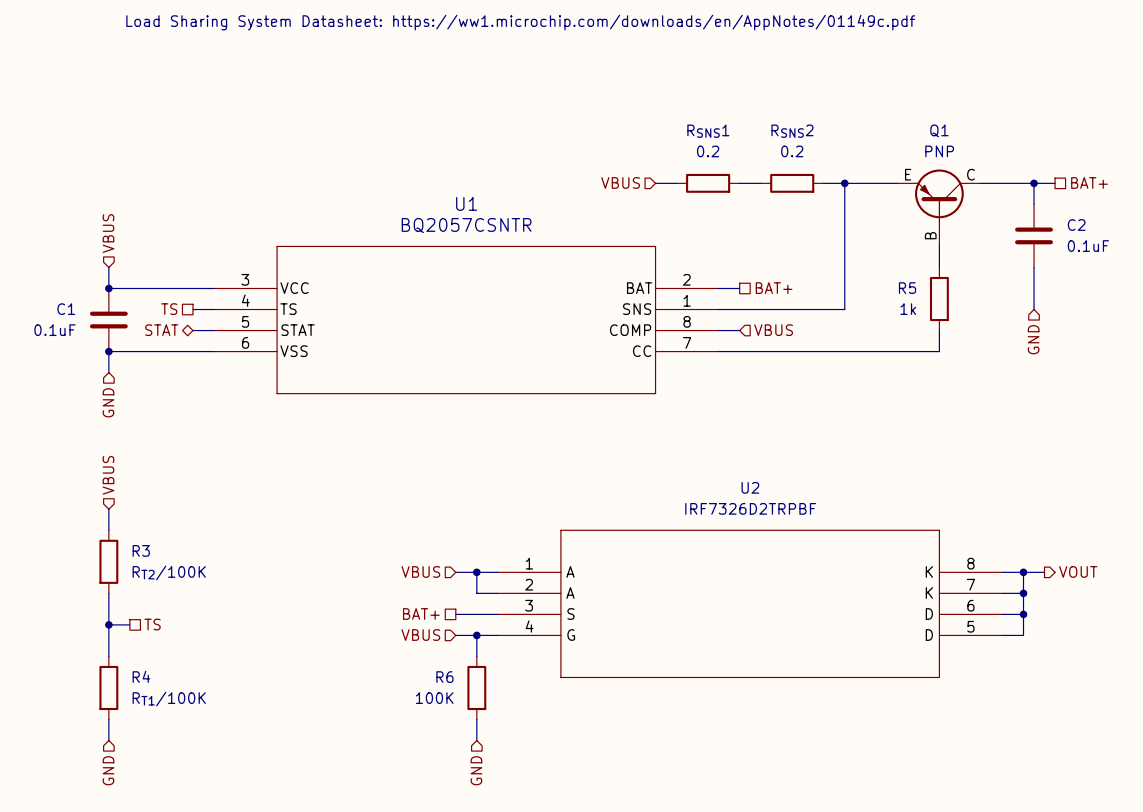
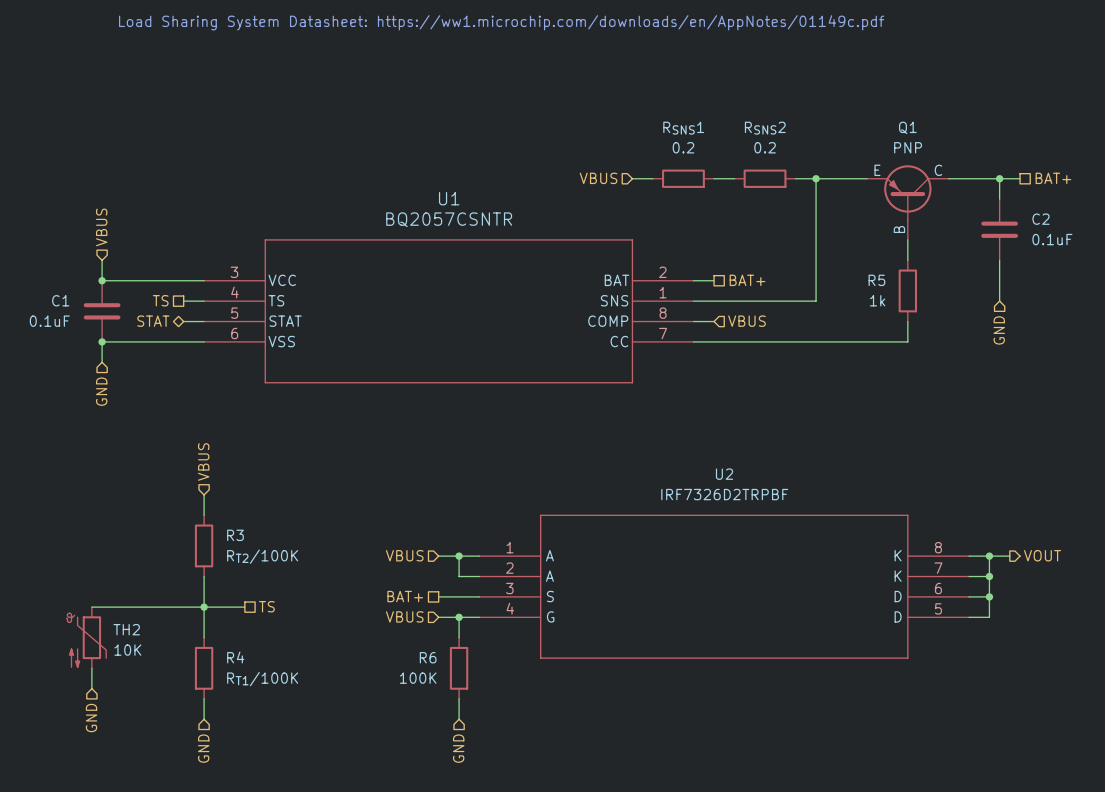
hierarchical label position: VBUS (108, 475) -> VBUS (203, 461)
wire: (108, 509) (108, 530) -> (204, 494) (204, 515)
R3 position: (108, 561) -> (204, 545)
wire: (108, 593) (108, 656) -> (204, 576) (204, 637)
wire: none -> (91, 607) (102, 607)
junction: (108, 624) -> none
wire: none -> (122, 607) (244, 607)
hierarchical label position: TS (152, 624) -> TS (266, 606)
junction: none -> (204, 607)
TH2: none -> 10K (86, 637)
wire: none -> (91, 668) (91, 688)
R4 position: (108, 687) -> (204, 668)
wire: (108, 719) (108, 740) -> (204, 698) (204, 719)
hierarchical label position: GND (108, 770) -> GND (91, 718)
hierarchical label: none -> GND (203, 748)

